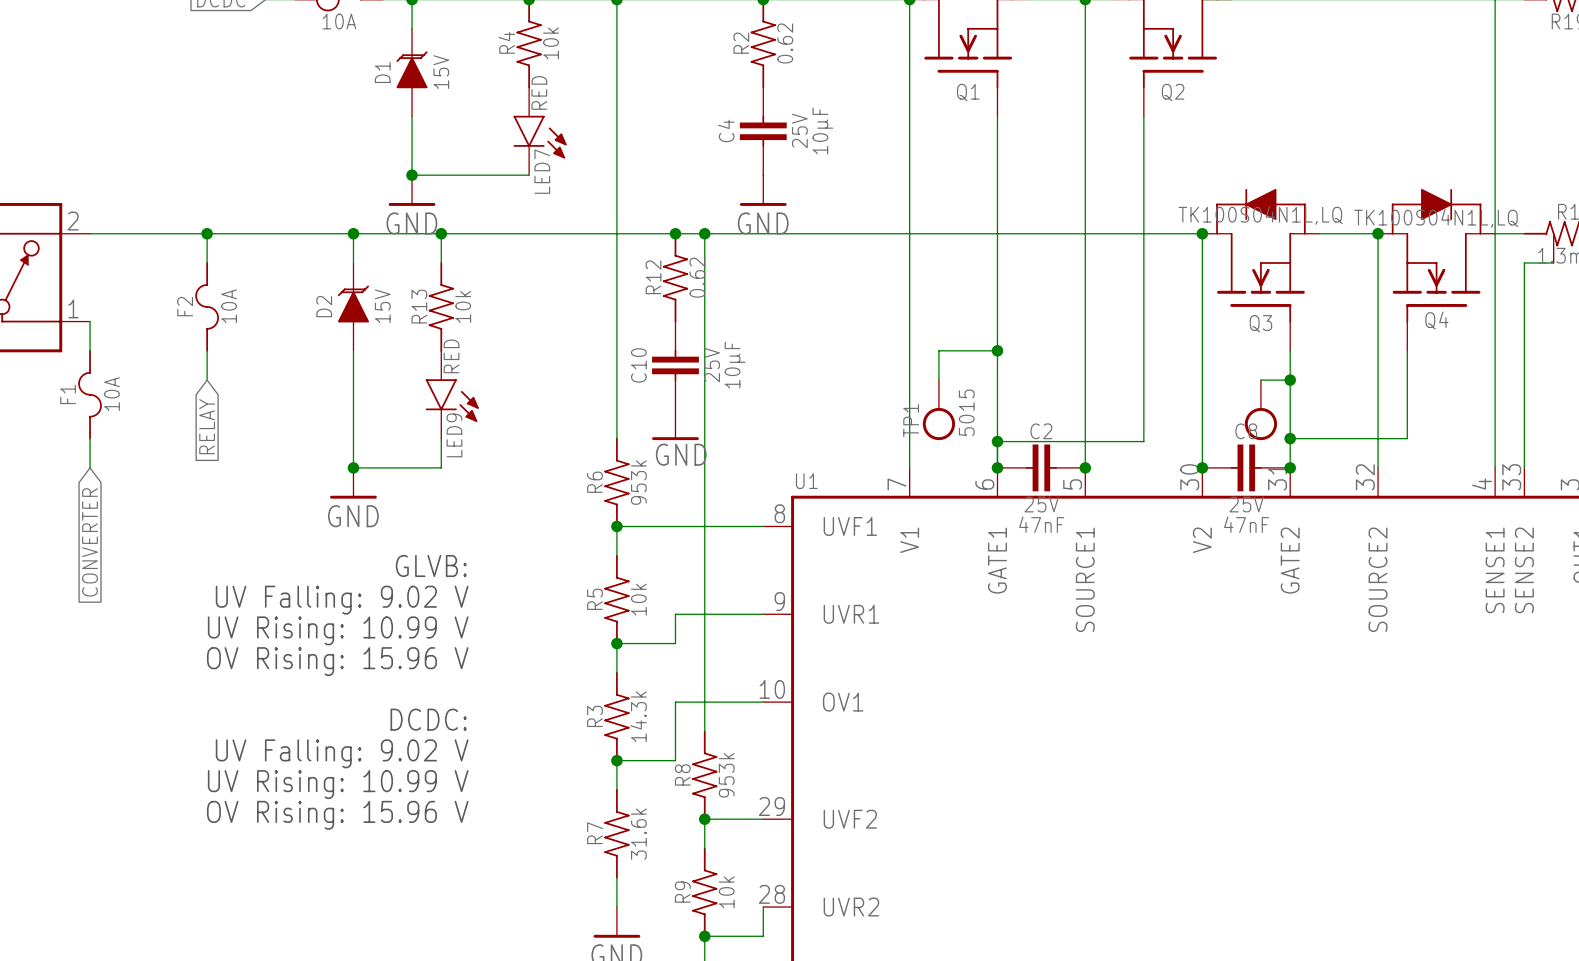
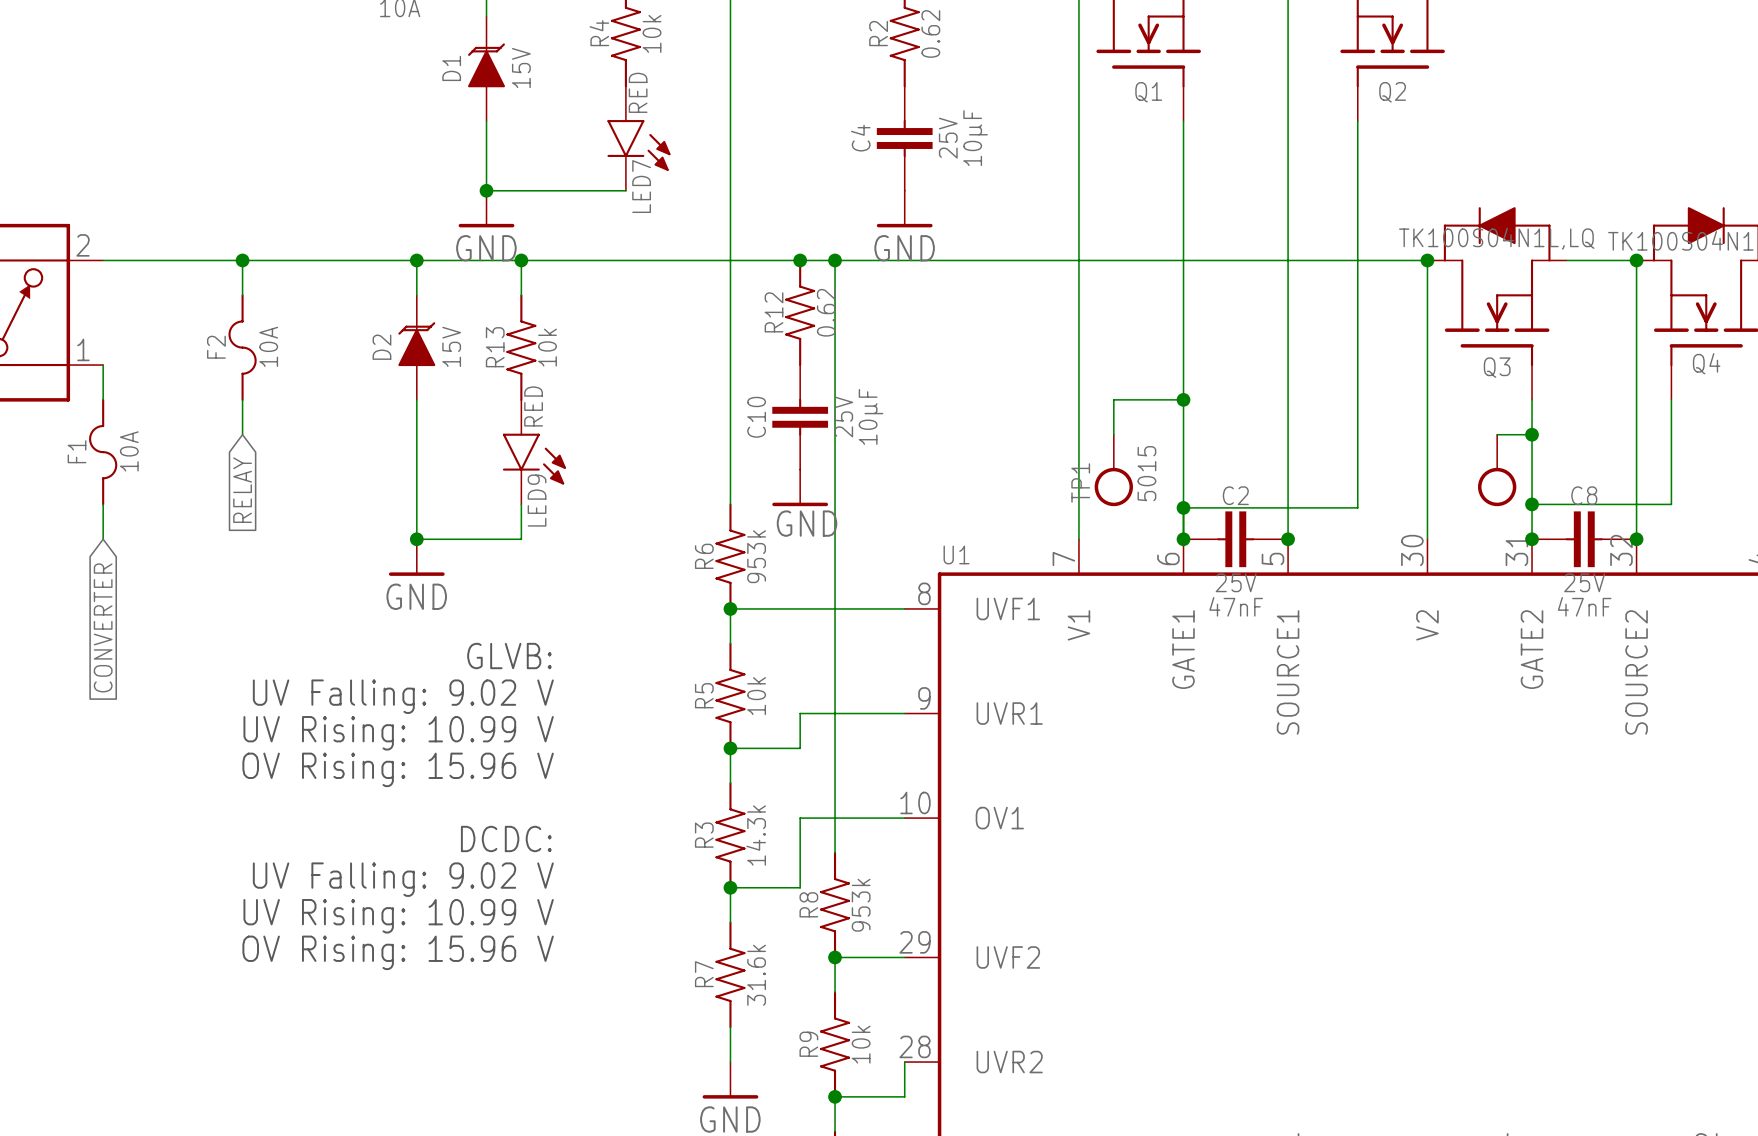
junction: (1202, 467) -> none
C8 position: (1246, 467) -> (1584, 539)
junction: none -> (1636, 539)

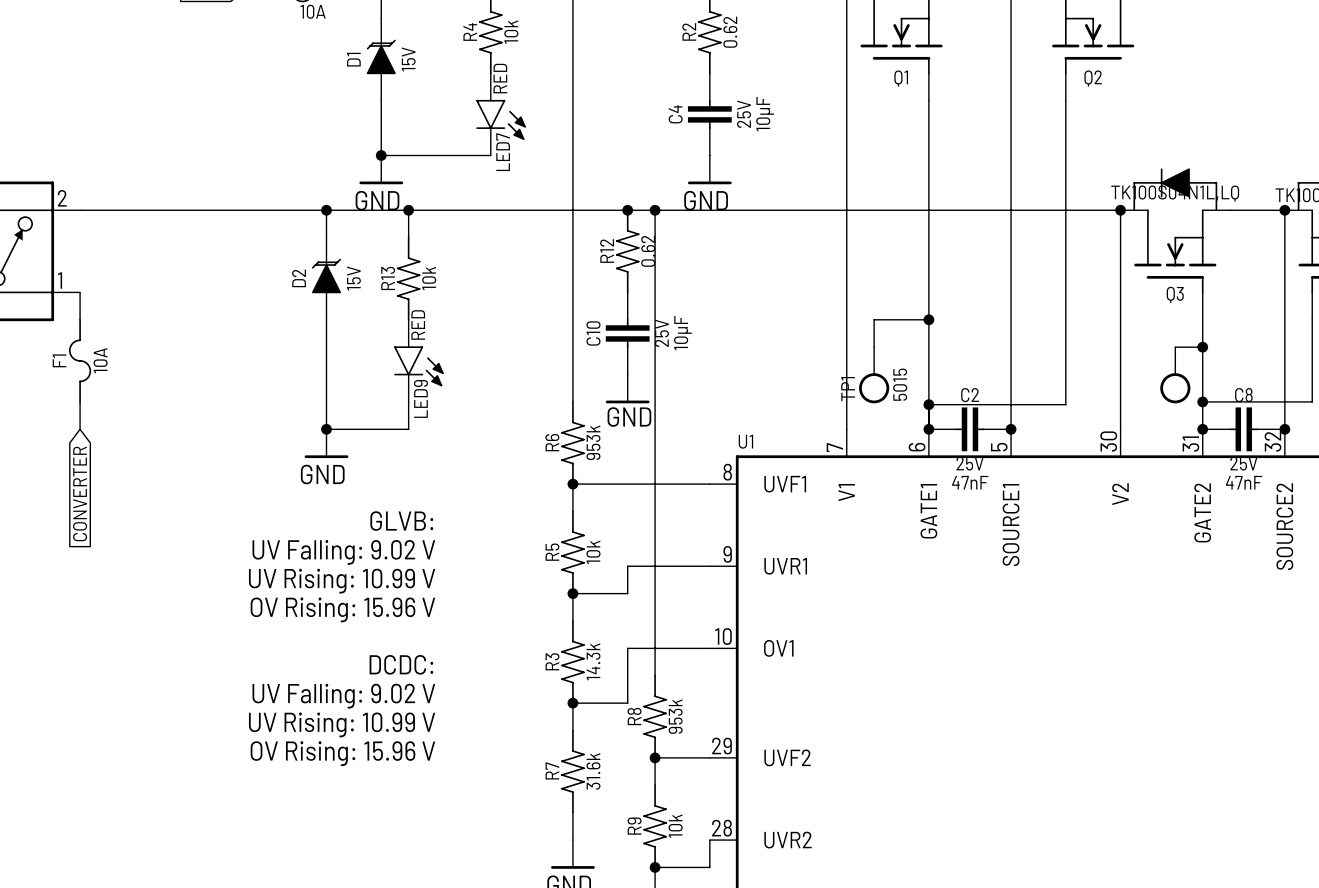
wire: (242, 260) (242, 295) -> none
junction: (242, 260) -> none
F2: (242, 347) -> none
wire: (242, 399) (242, 434) -> none
global label: RELAY (242, 490) -> none

